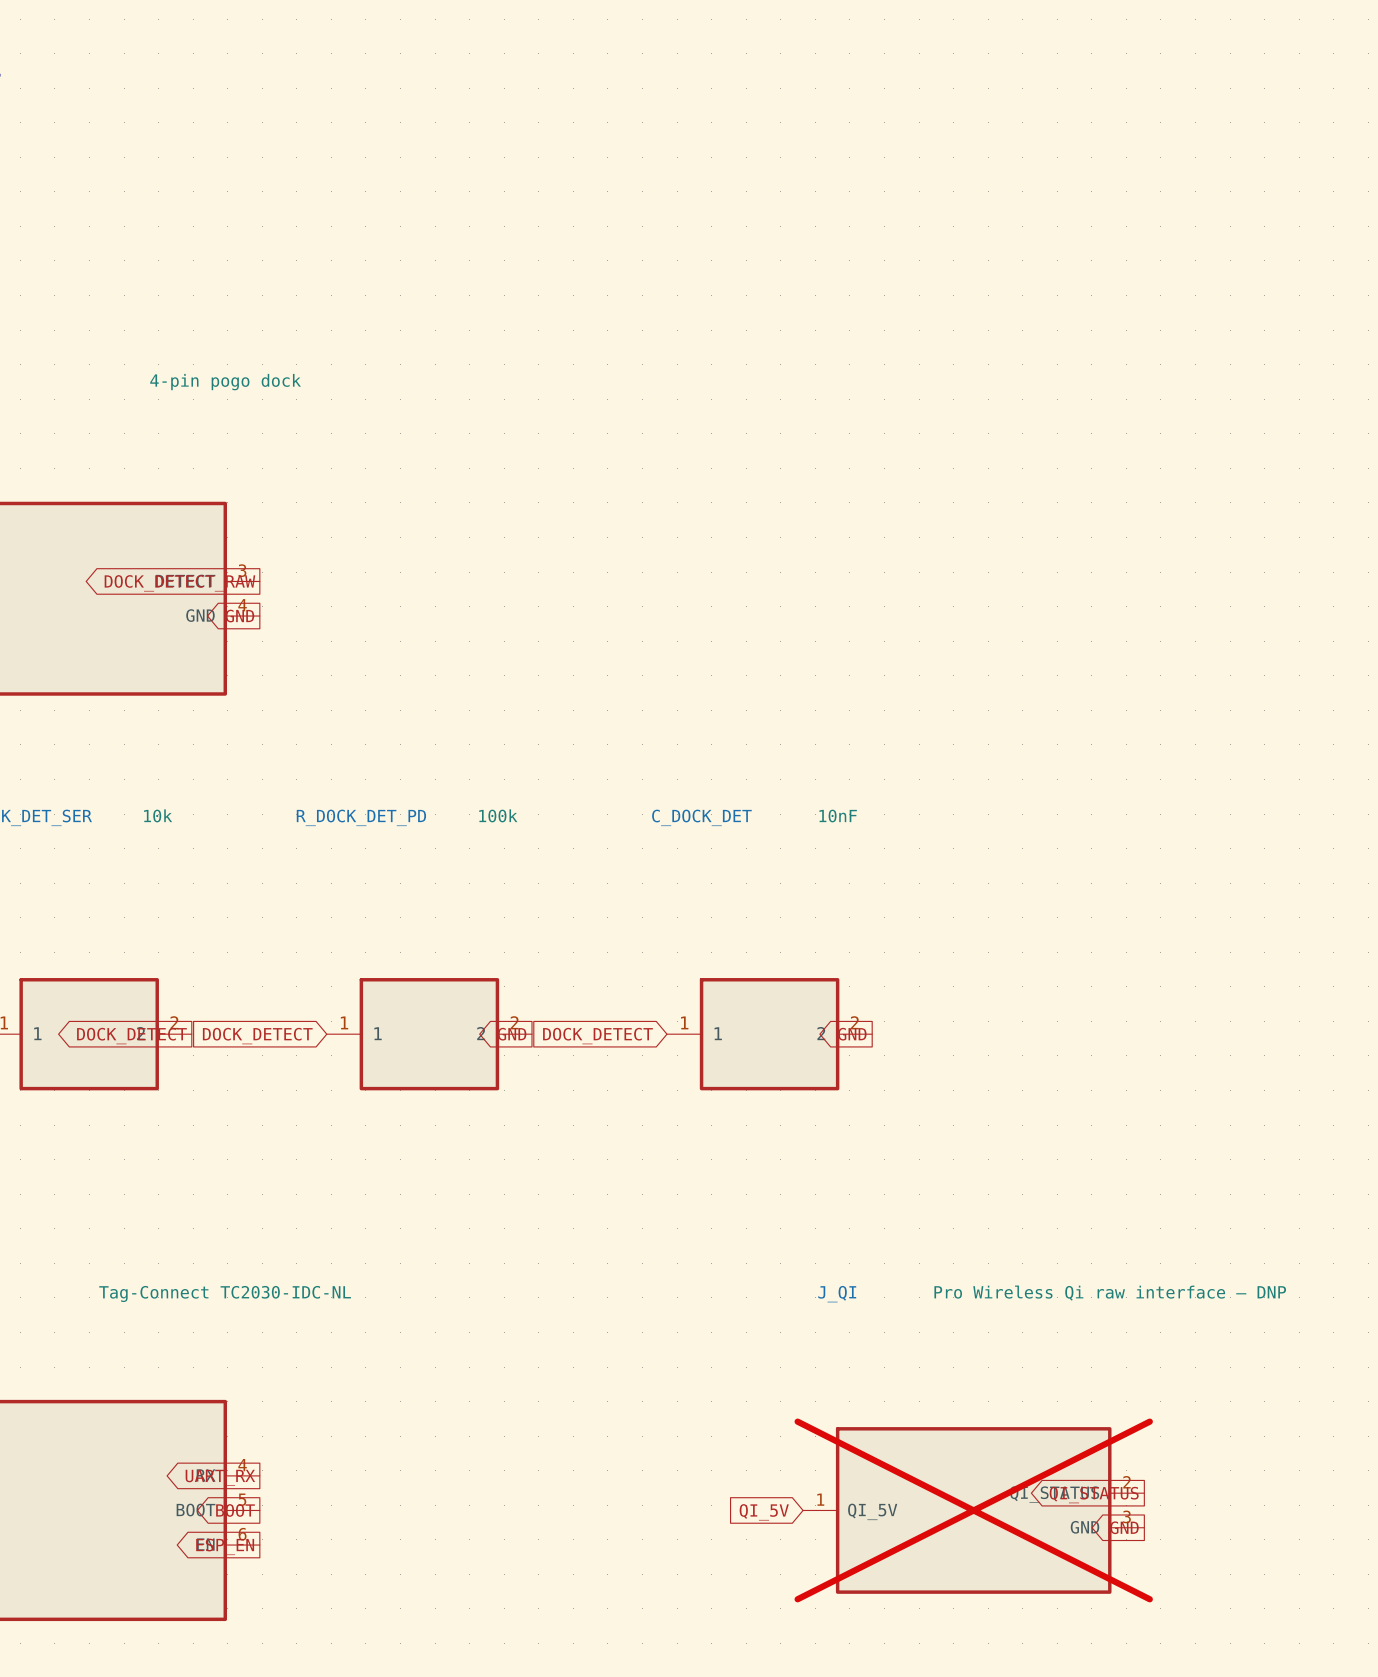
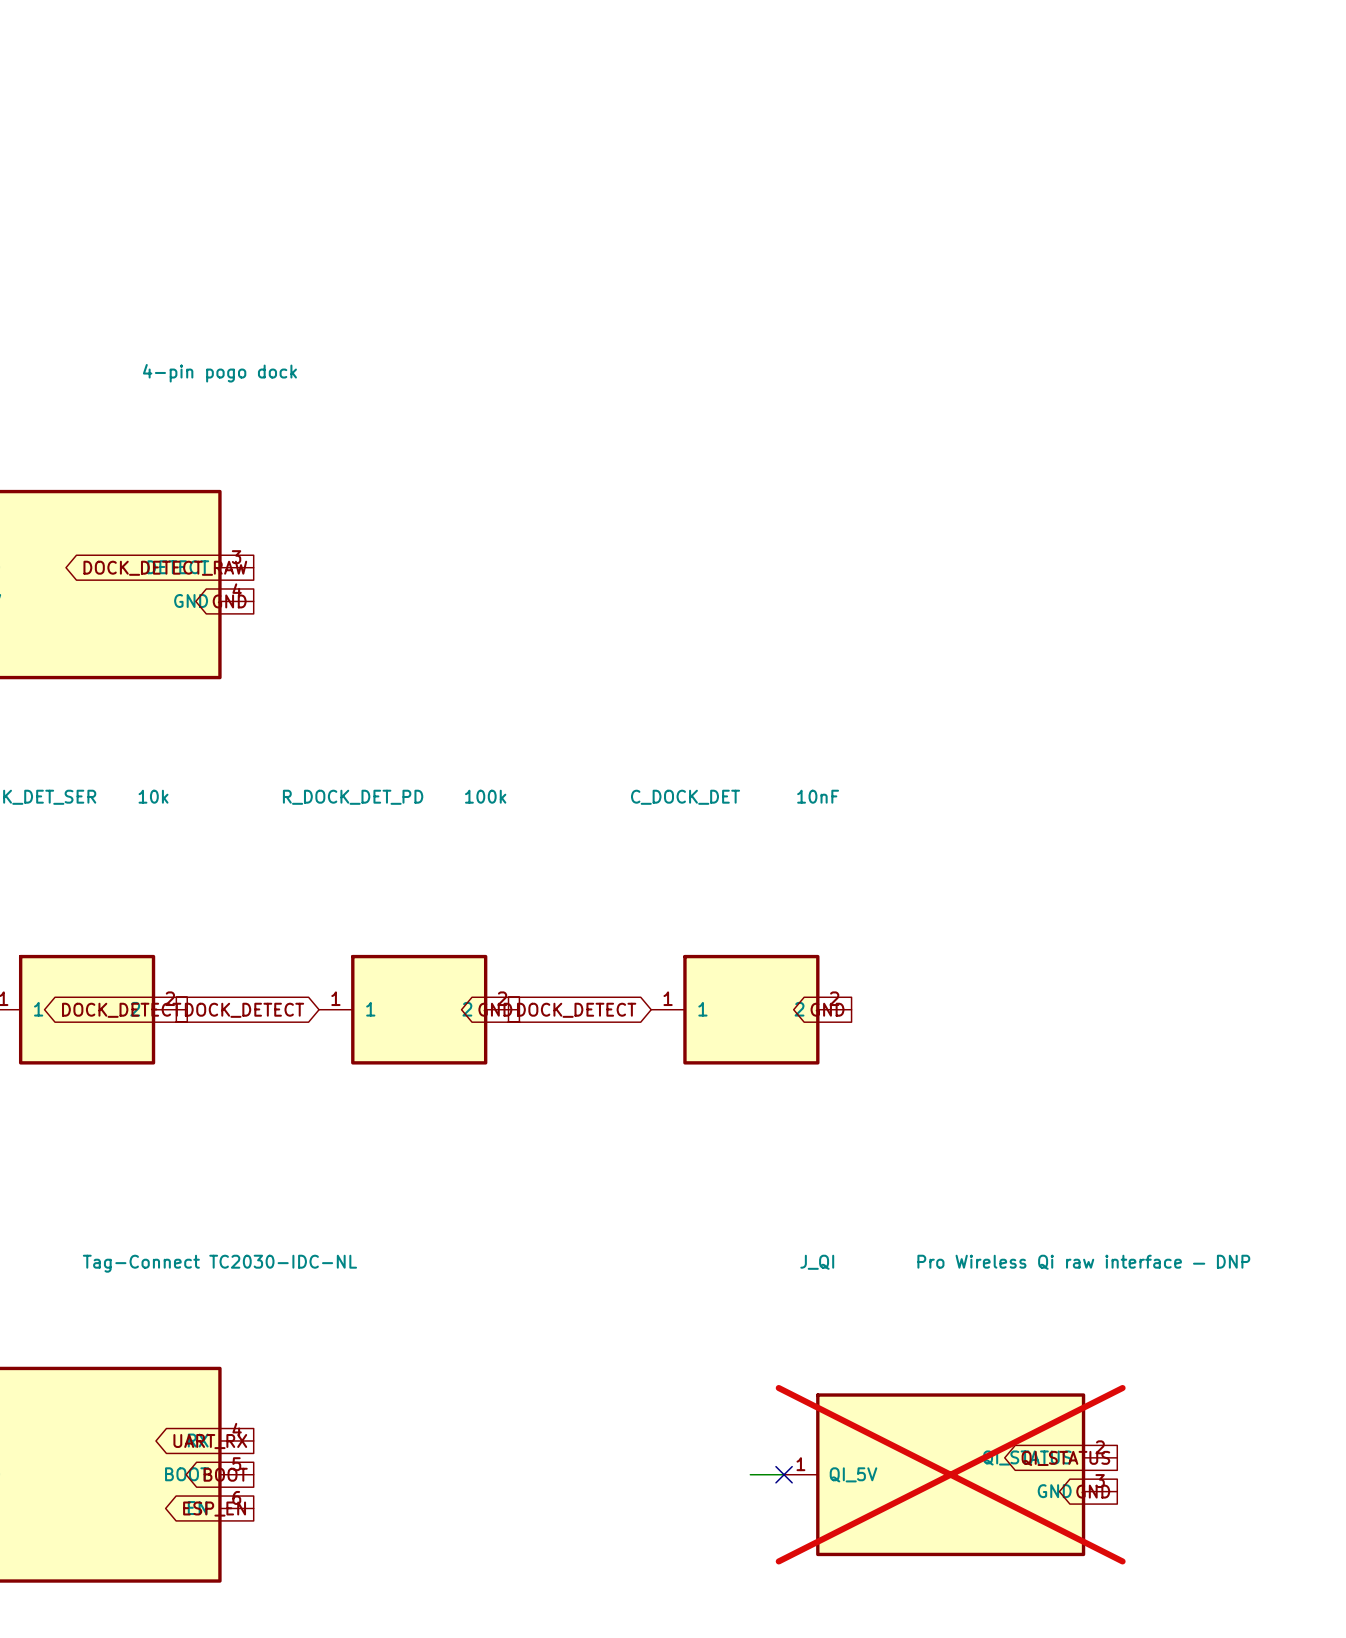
wire: none -> (750, 1474) (784, 1474)
no-connect mark: none -> (784, 1474)
global label: QI_5V (764, 1512) -> none

